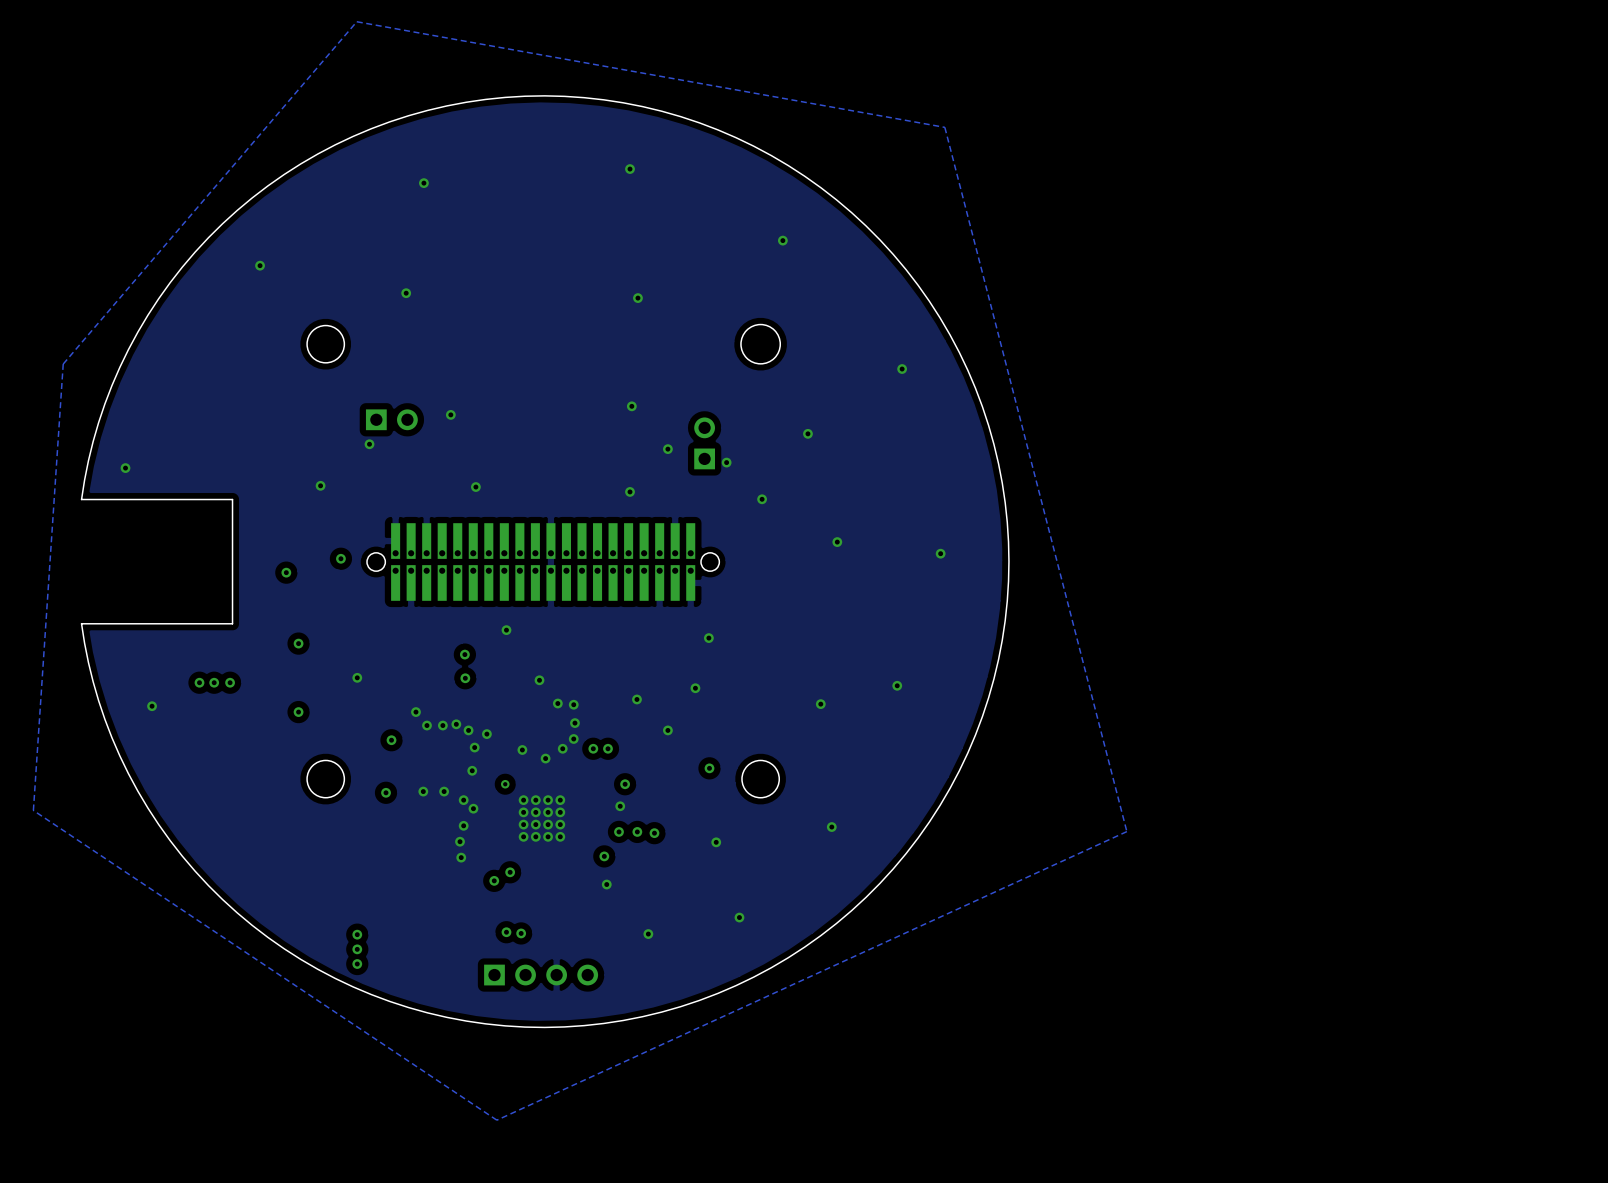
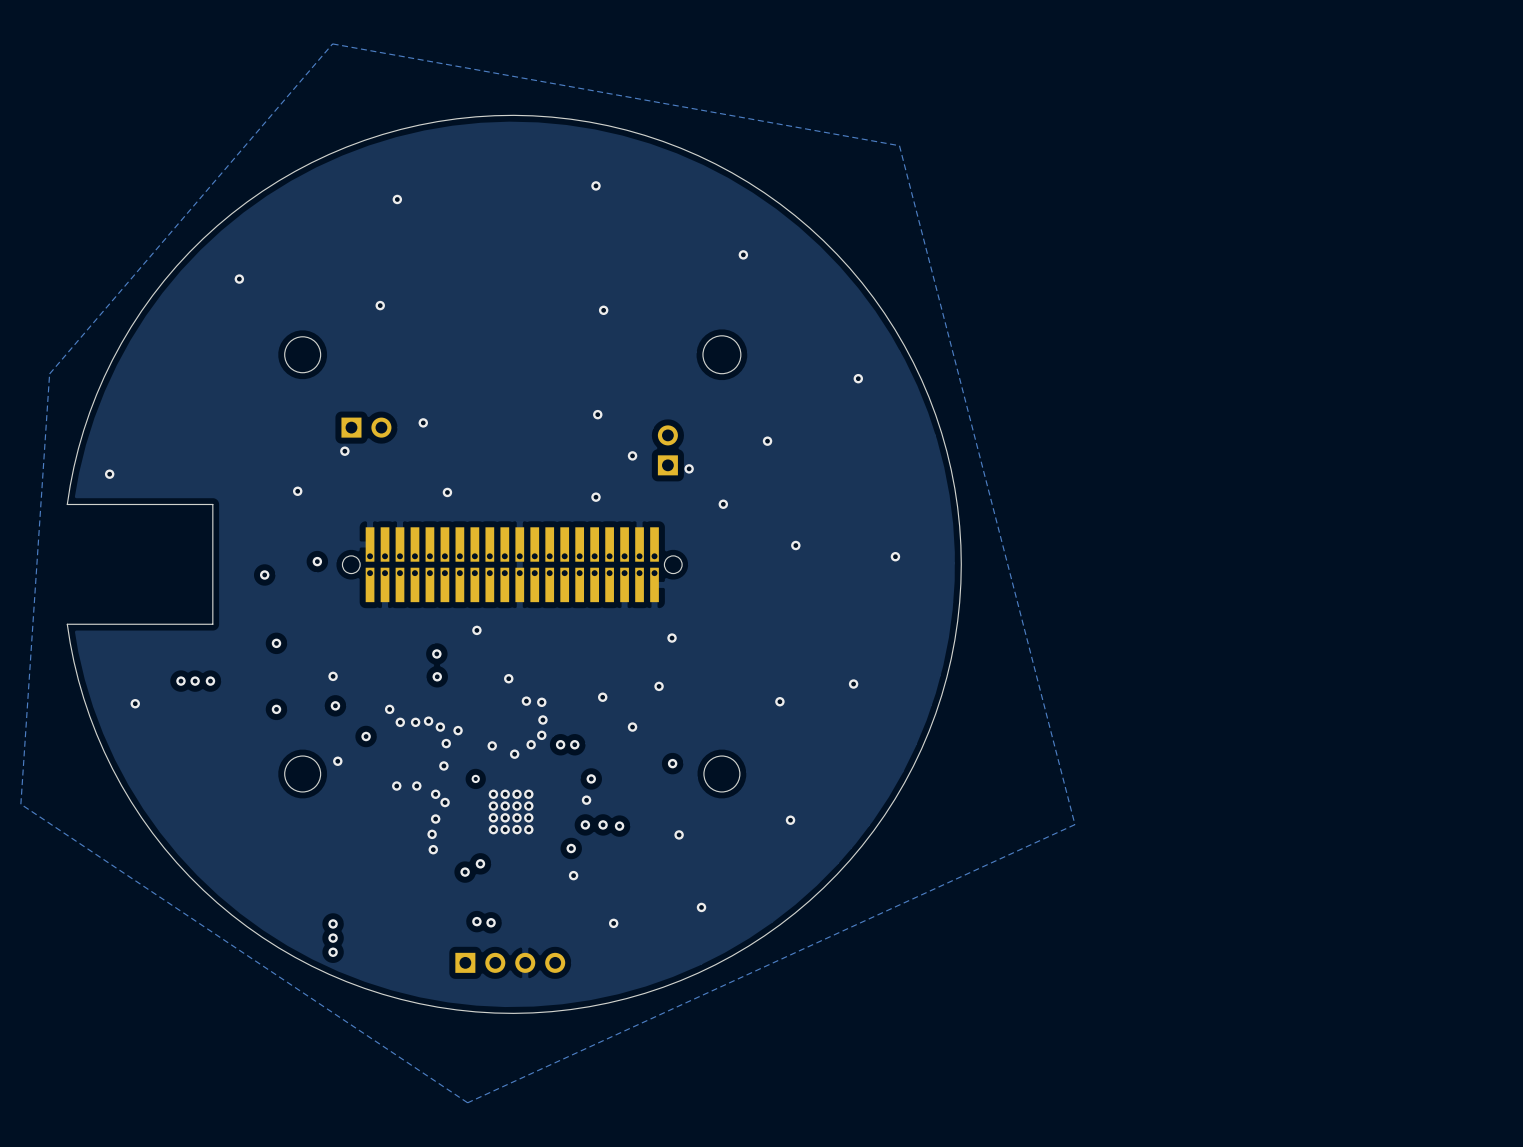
via: none -> (335, 705)
via position: (386, 792) -> (337, 761)

